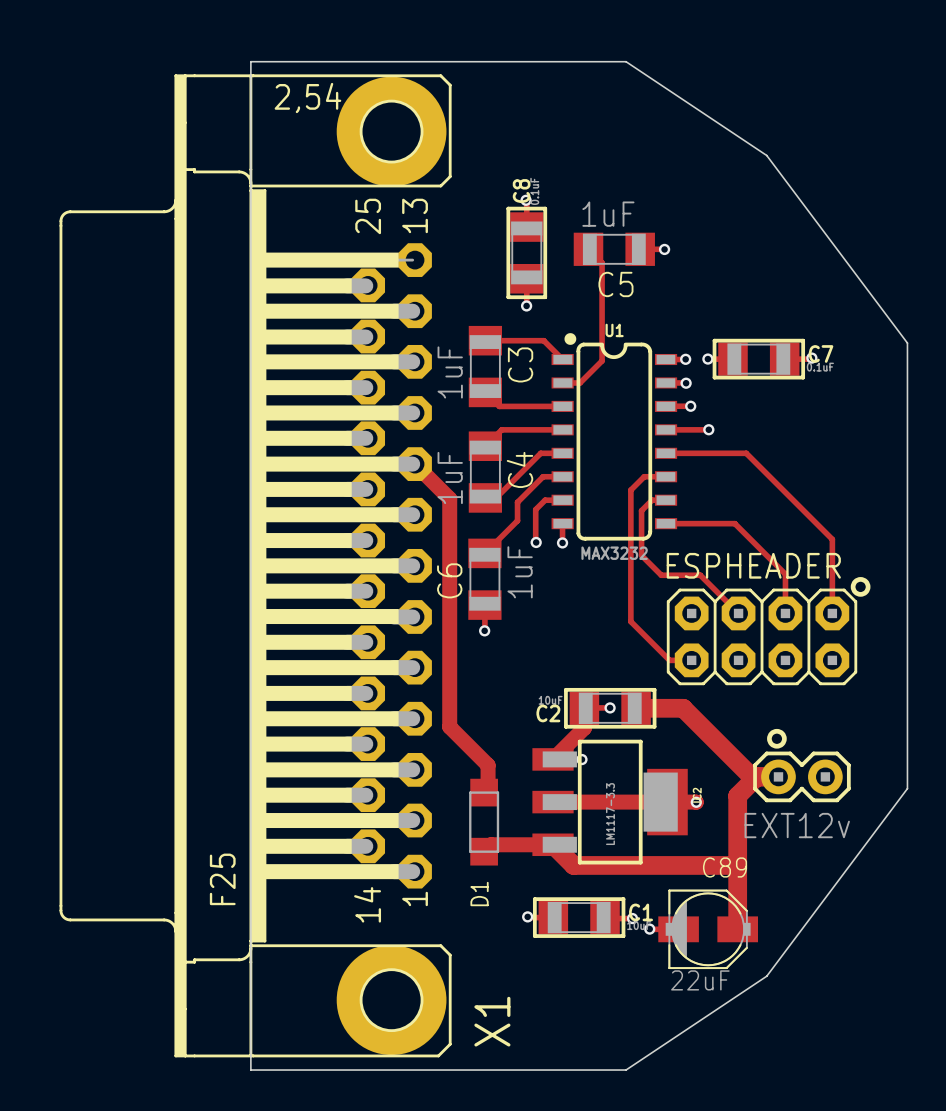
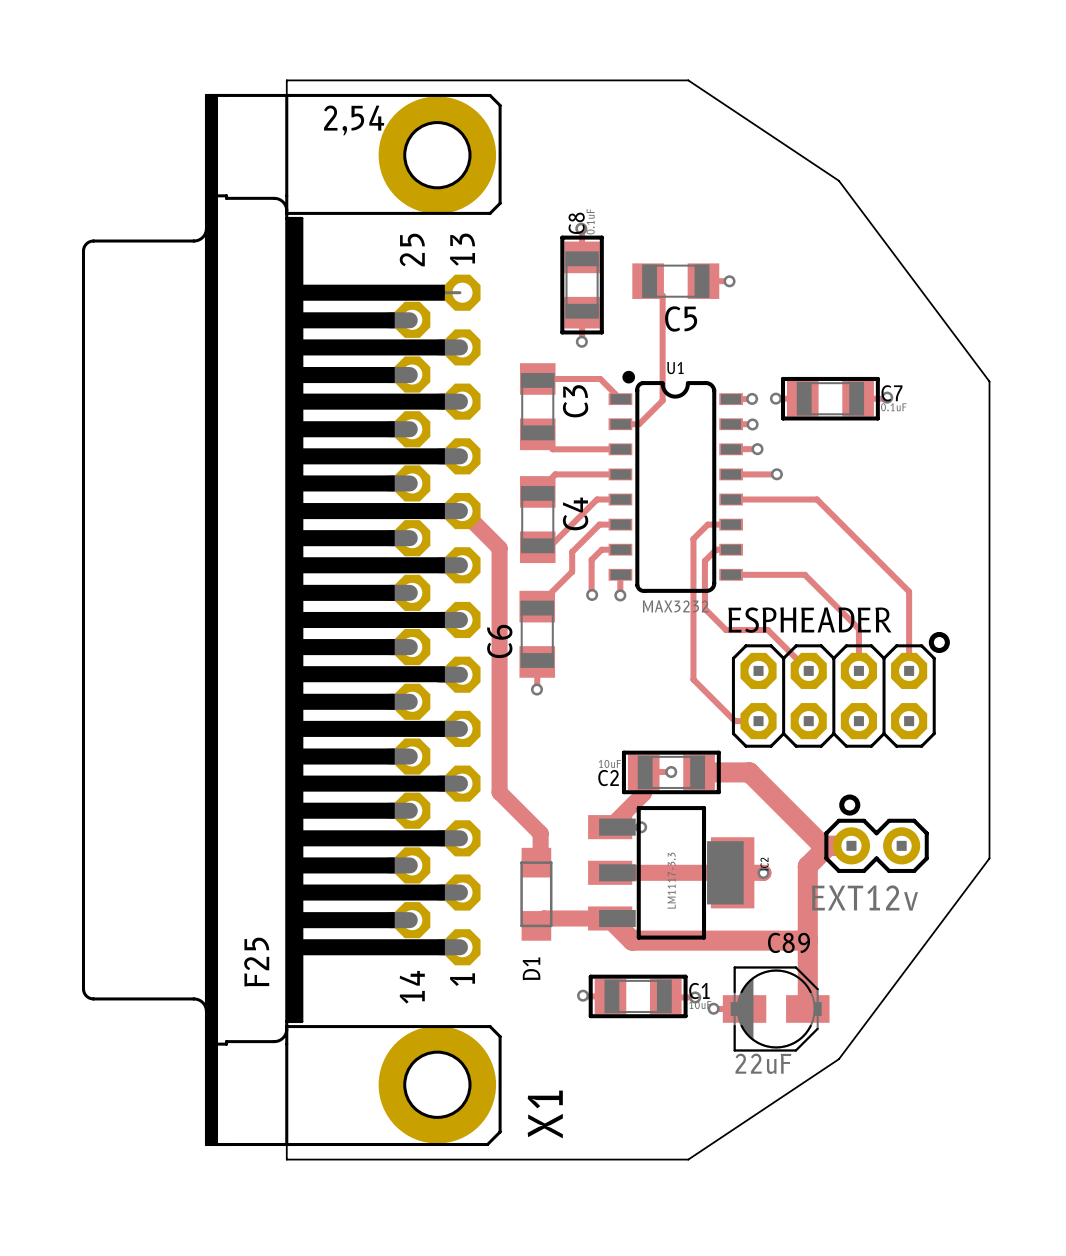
C5 value: 1uF (608, 214) -> none
C3 value: 1uF (450, 372) -> none
C4 value: 1uF (450, 477) -> none
C6 value: 1uF (520, 572) -> none

